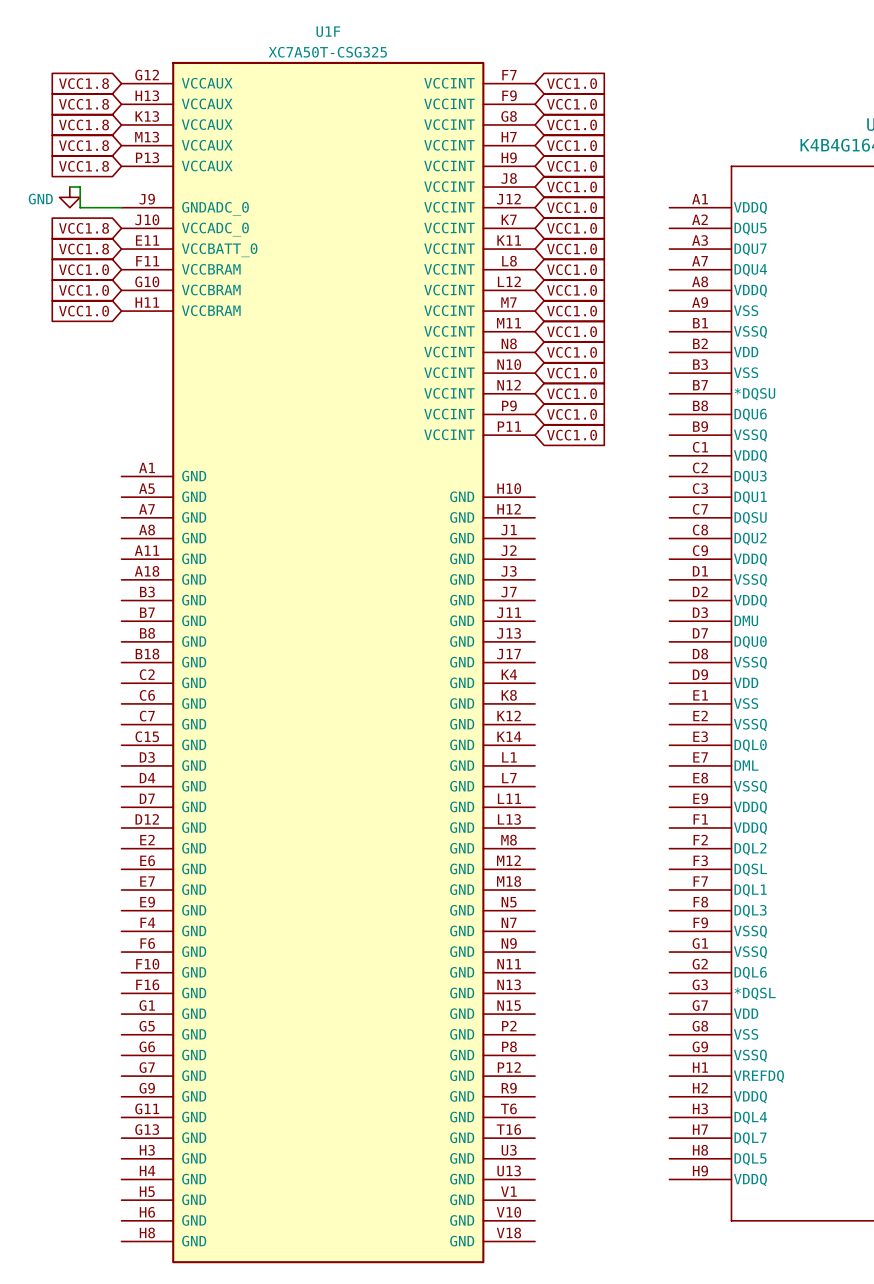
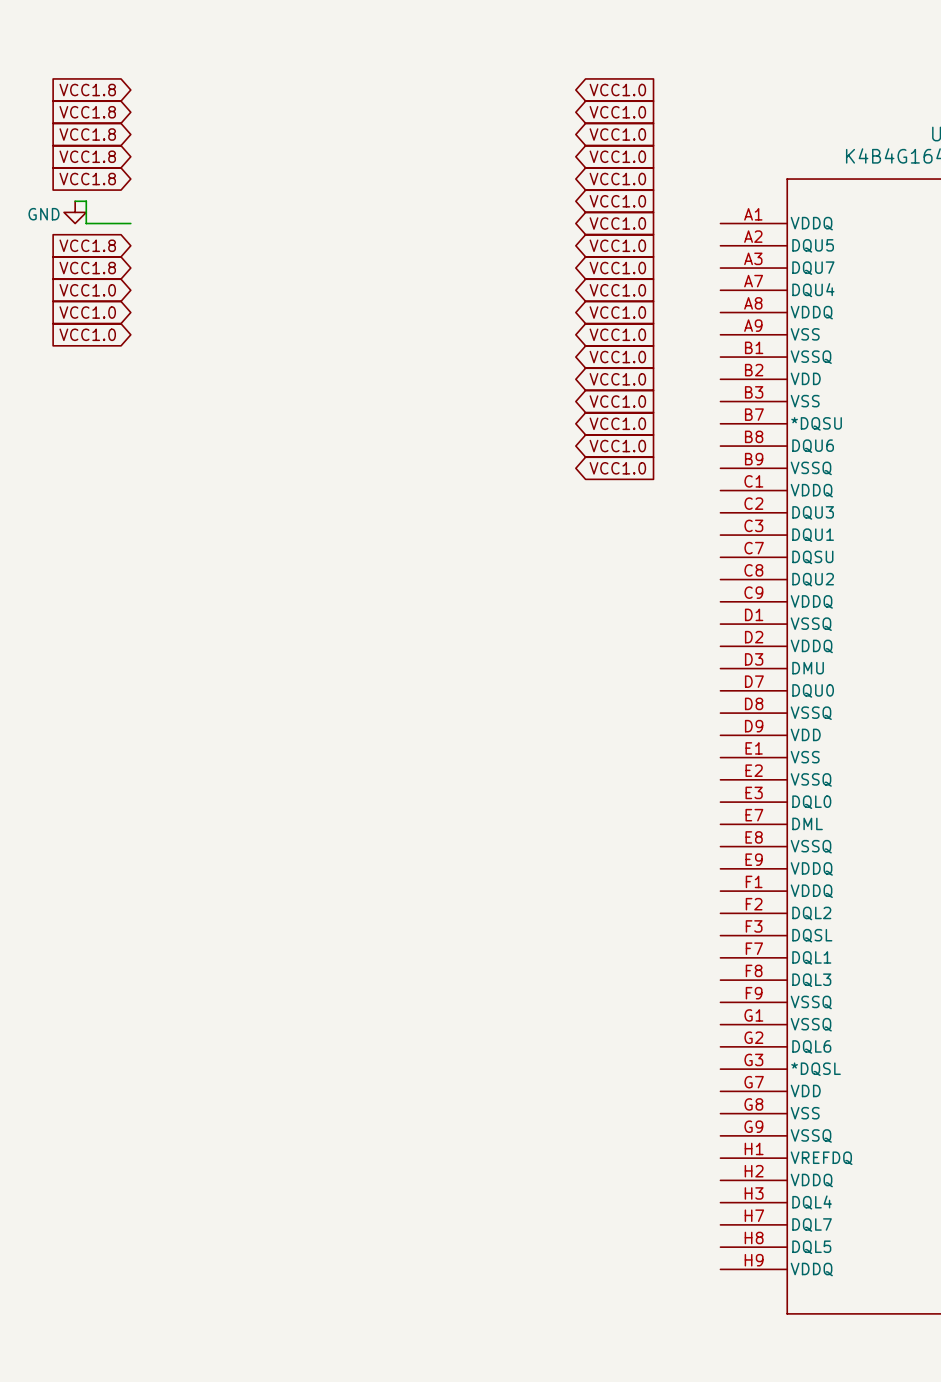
U1F: XC7A50T-CSG325 (328, 662) -> none

